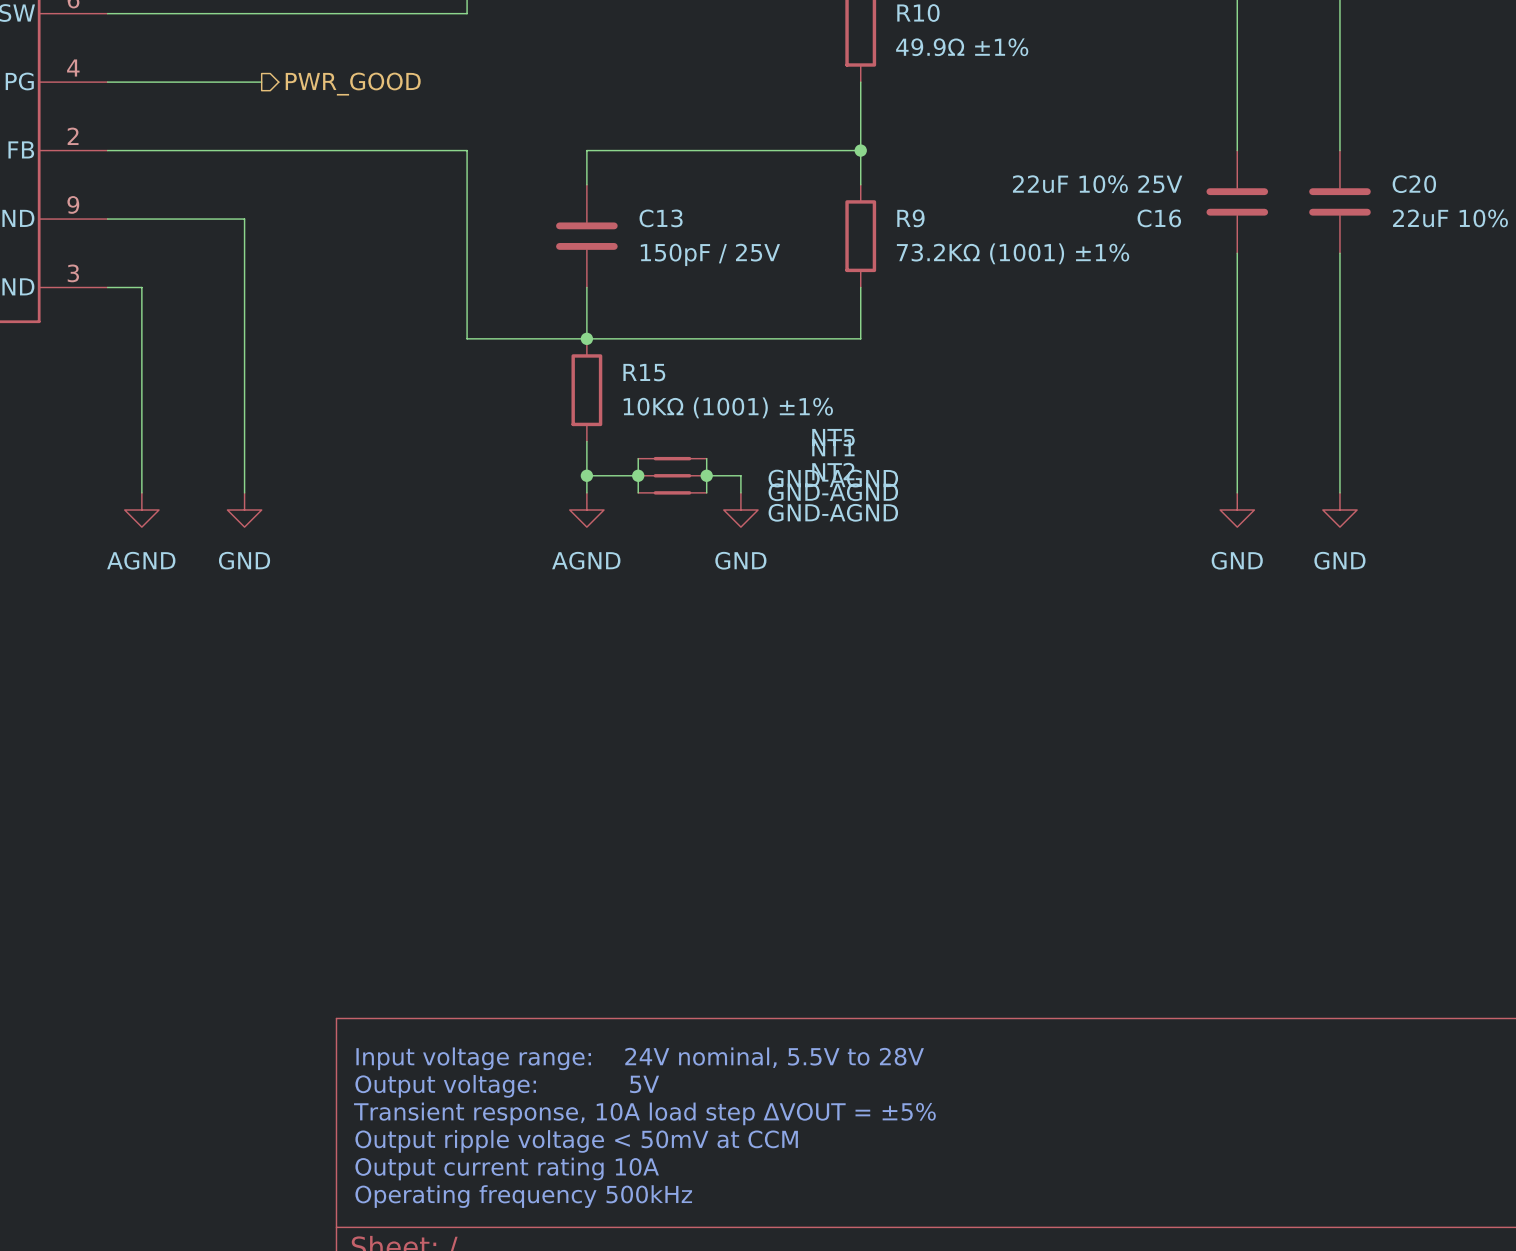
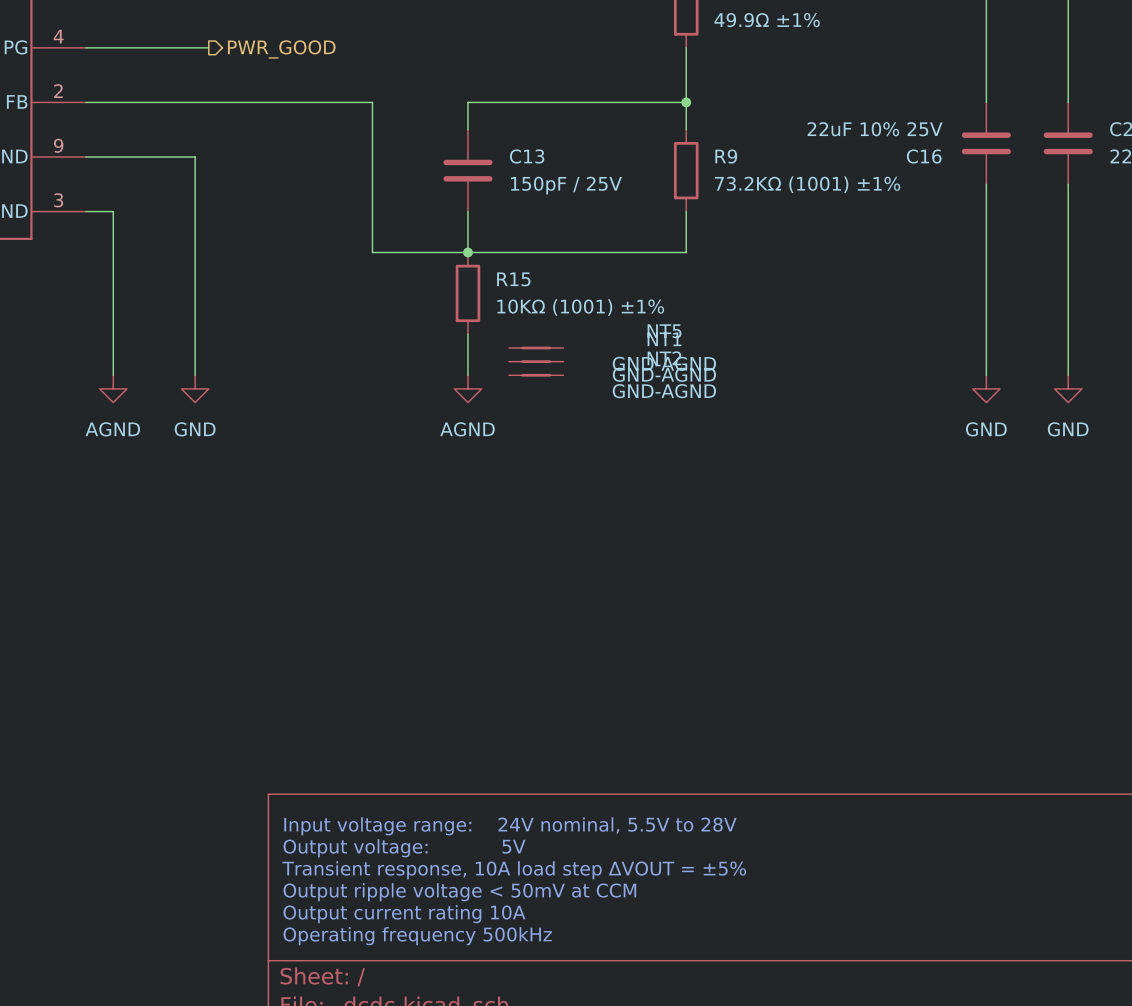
wire: (638, 458) (638, 492) -> none
wire: (706, 458) (706, 492) -> none
wire: (586, 475) (638, 475) -> none
junction: (586, 475) -> none
junction: (638, 475) -> none
wire: (706, 475) (740, 475) (740, 492) -> none
junction: (706, 475) -> none
power symbol: GND (740, 510) -> none

